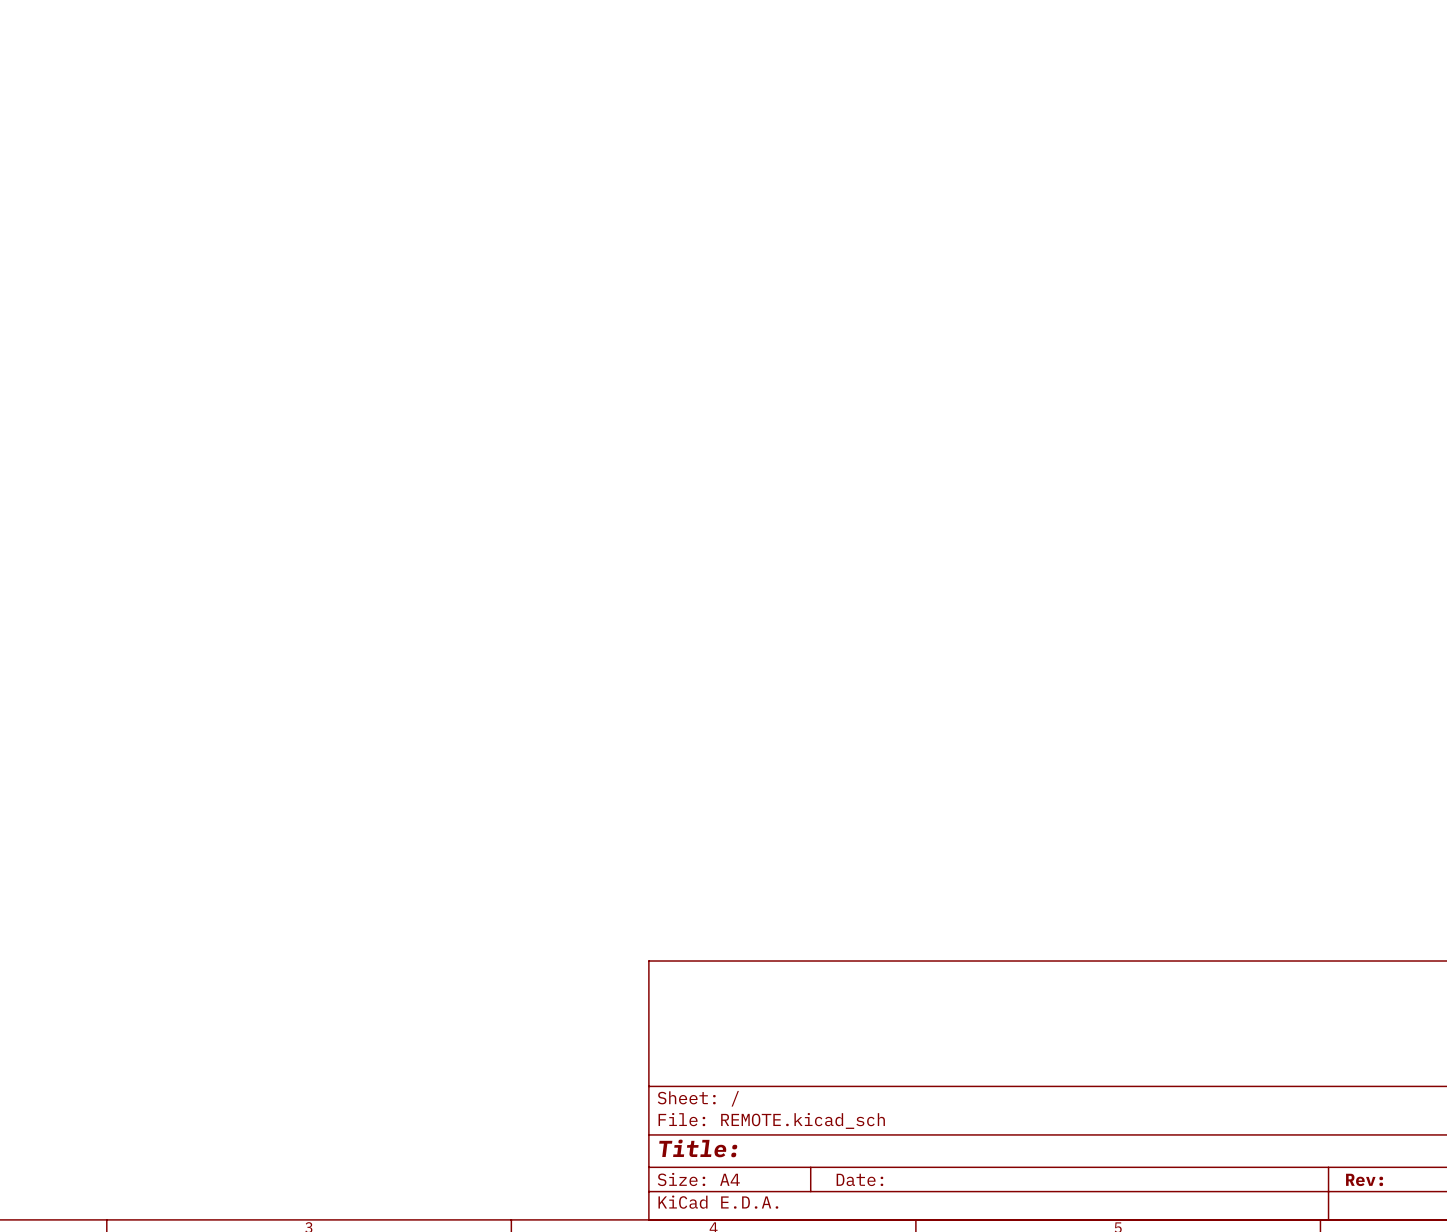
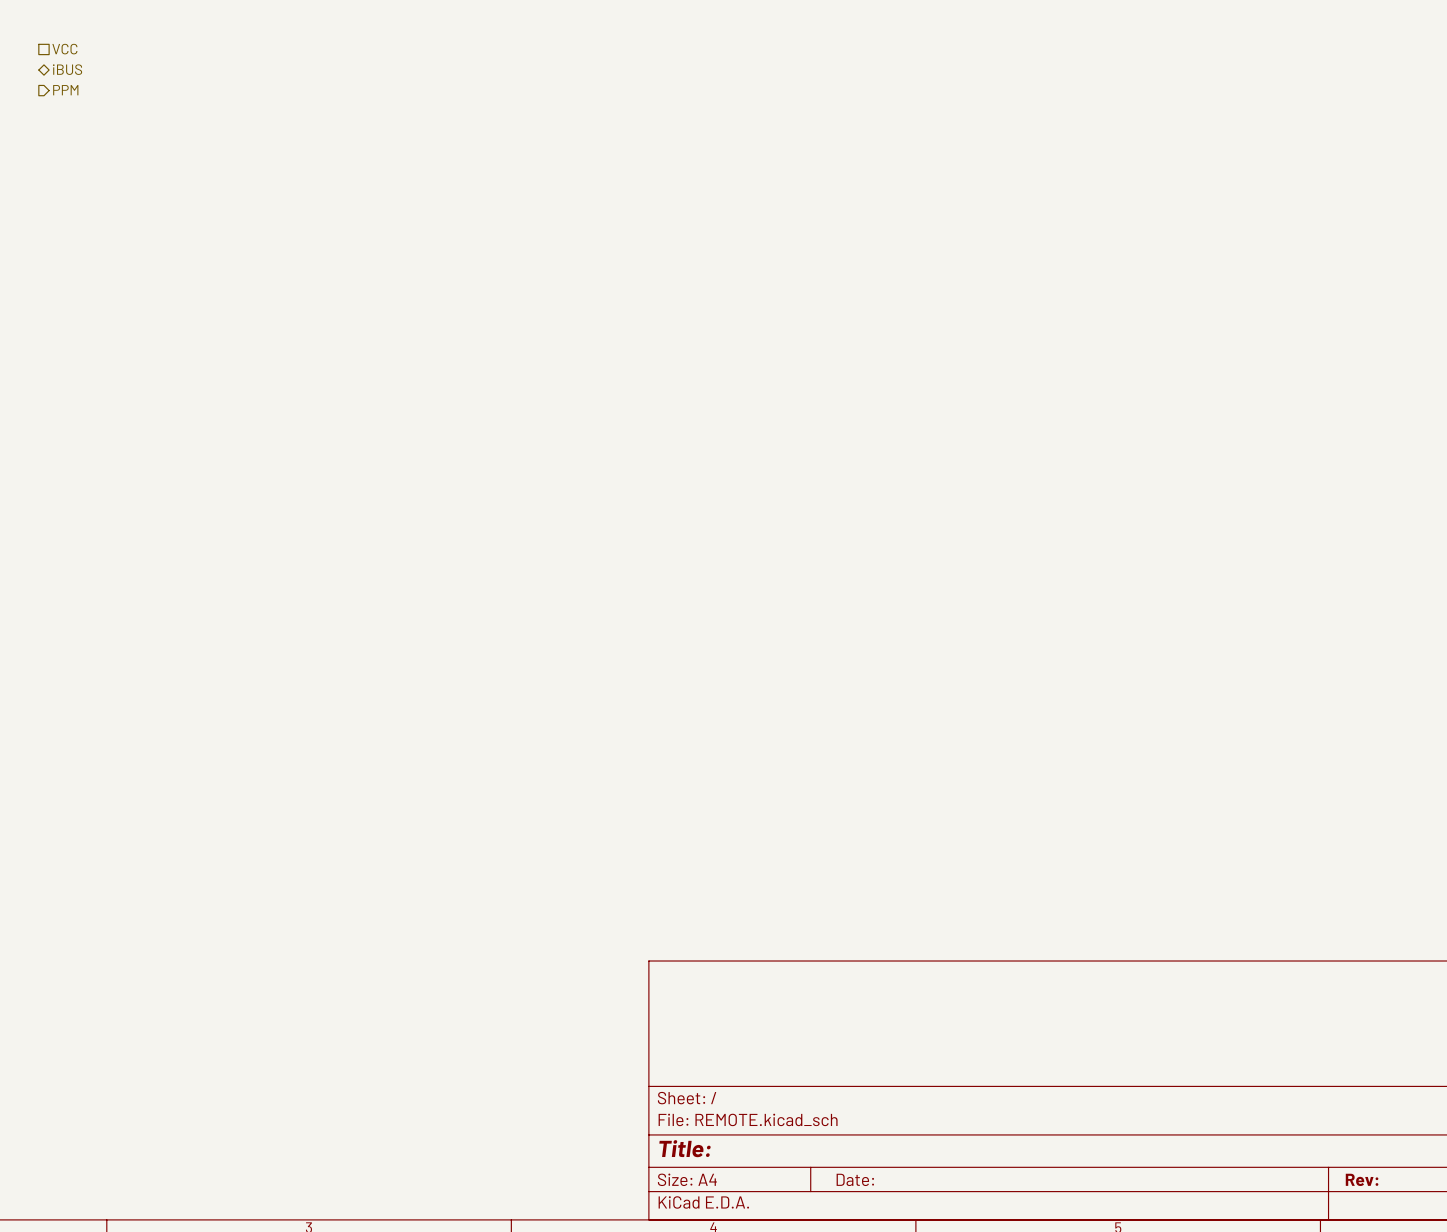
hierarchical label: none -> VCC (64, 49)
hierarchical label: none -> iBUS (67, 69)
hierarchical label: none -> PPM (65, 90)

